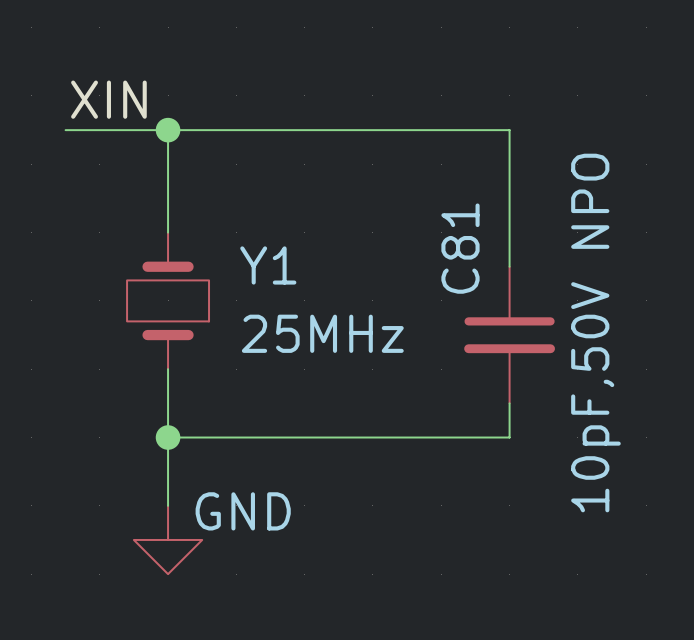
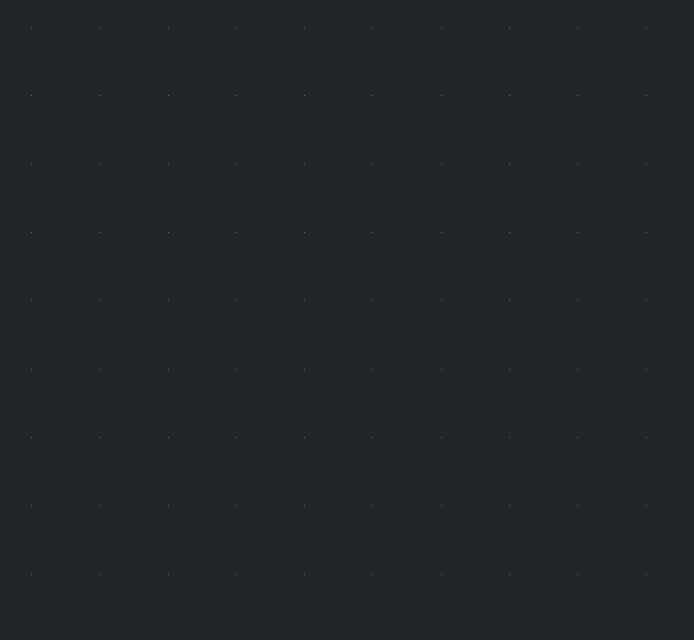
label: XIN (108, 99) -> none
wire: (65, 130) (509, 130) (509, 266) -> none
wire: (168, 130) (168, 232) -> none
junction: (168, 130) -> none
Y1: 25MHz (168, 300) -> none
C81: 10pF,50V NPO (509, 335) -> none
wire: (168, 369) (168, 505) -> none
wire: (509, 403) (509, 437) (168, 437) -> none
junction: (168, 437) -> none
power symbol: GND (168, 539) -> none

